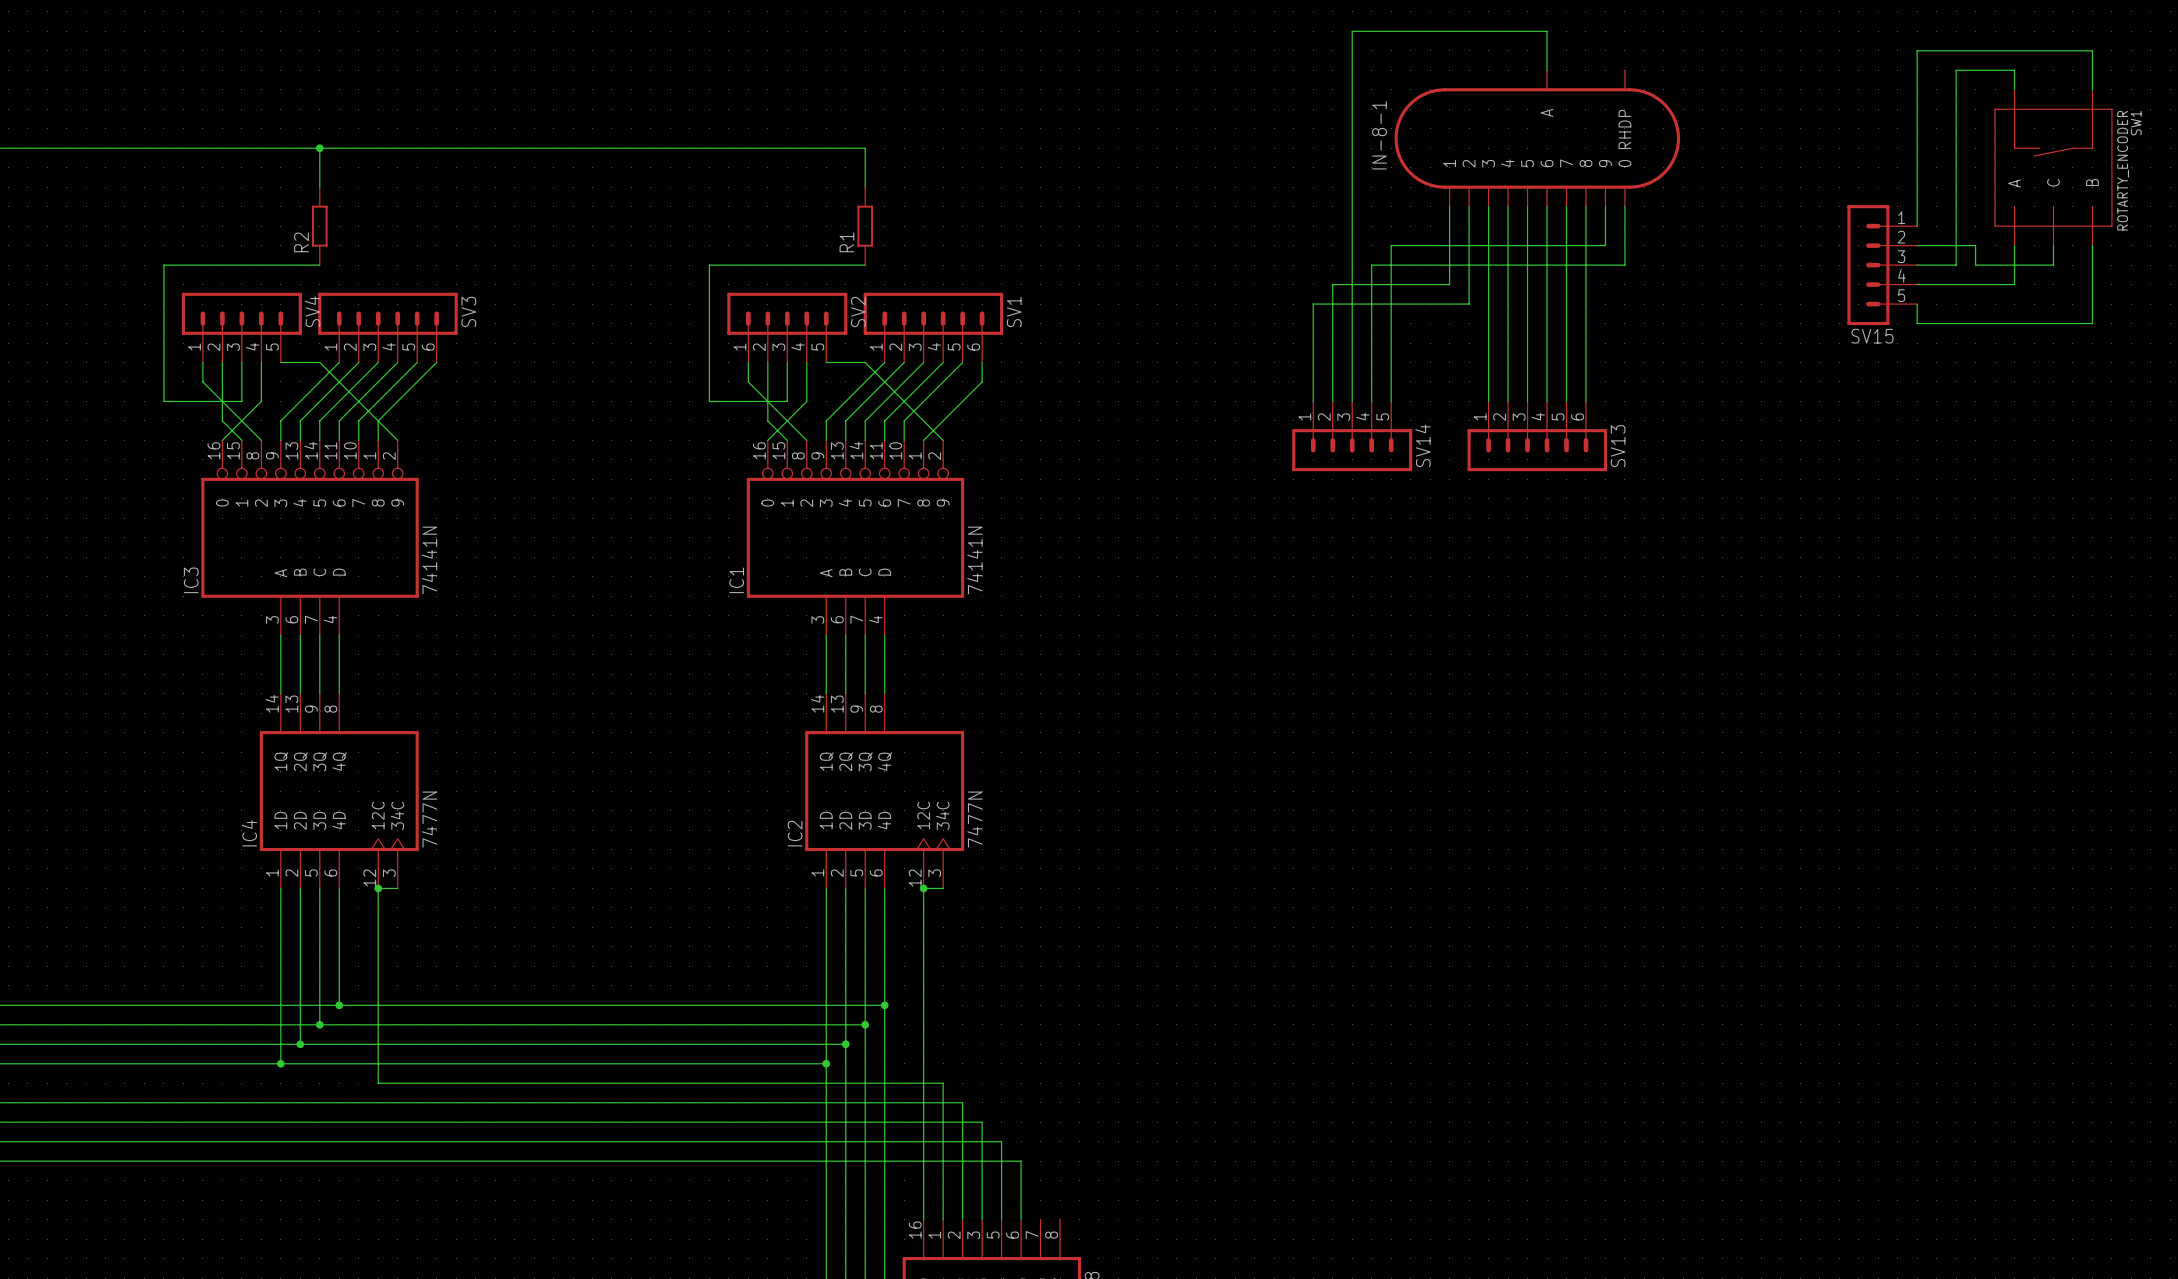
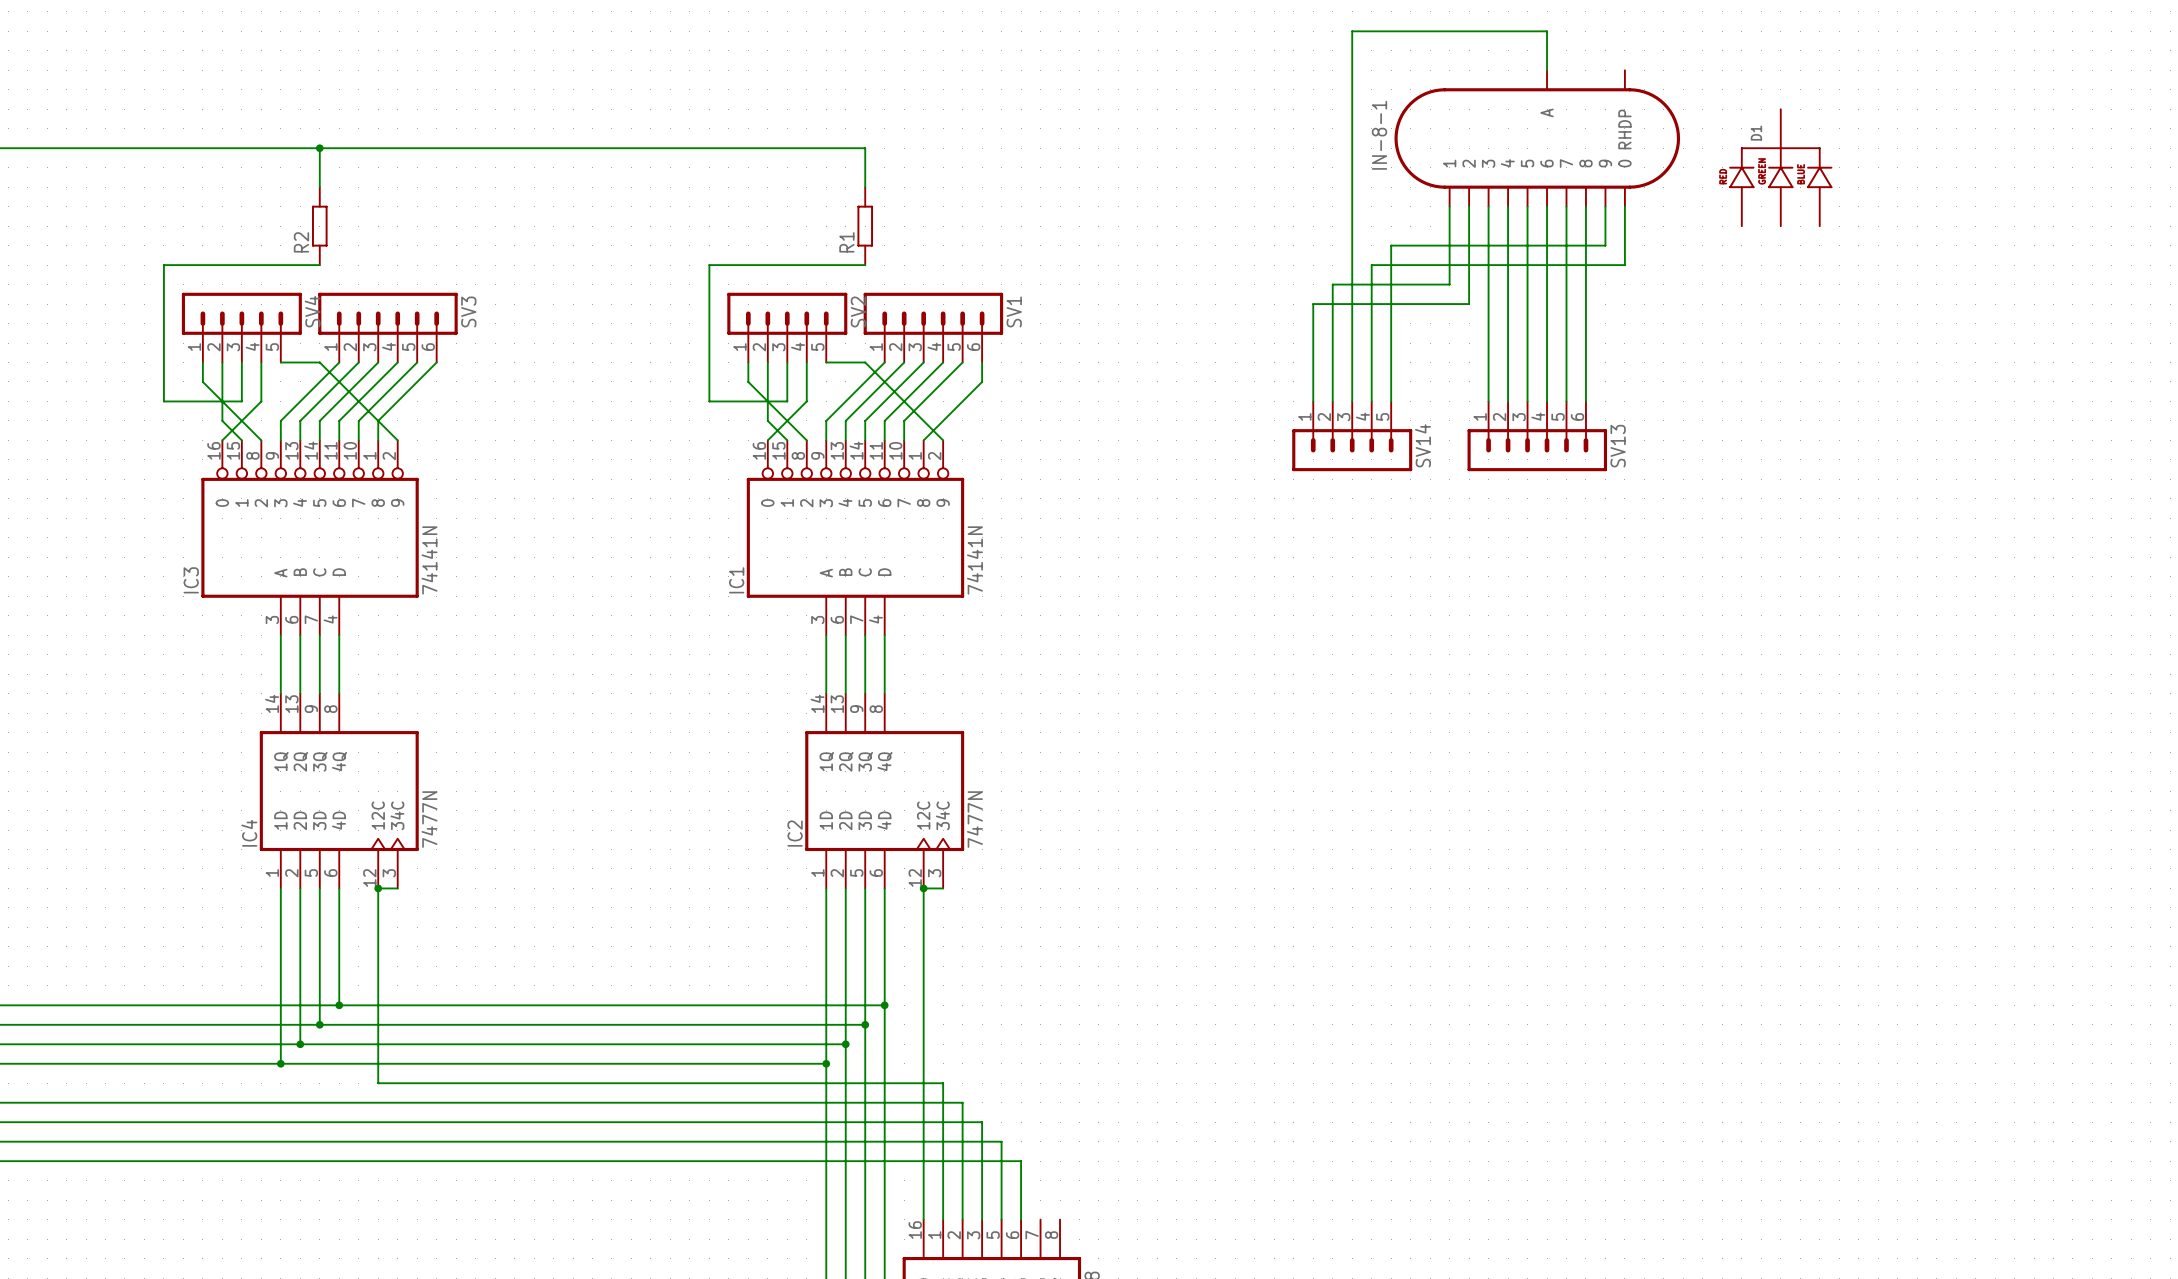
wire: (2014, 89) (2014, 70) (1956, 70) (1956, 265) (1917, 265) -> none
wire: (2092, 89) (2092, 50) (1917, 50) (1917, 226) -> none
D1: none -> (1780, 167)
SW1: ROTARTY_ENCODER (2053, 167) -> none
wire: (1917, 245) (1975, 245) (1975, 265) (2053, 265) (2053, 245) -> none
wire: (2014, 245) (2014, 284) (1917, 284) -> none
wire: (2092, 245) (2092, 323) (1917, 323) (1917, 304) -> none
SV15: (1882, 265) -> none

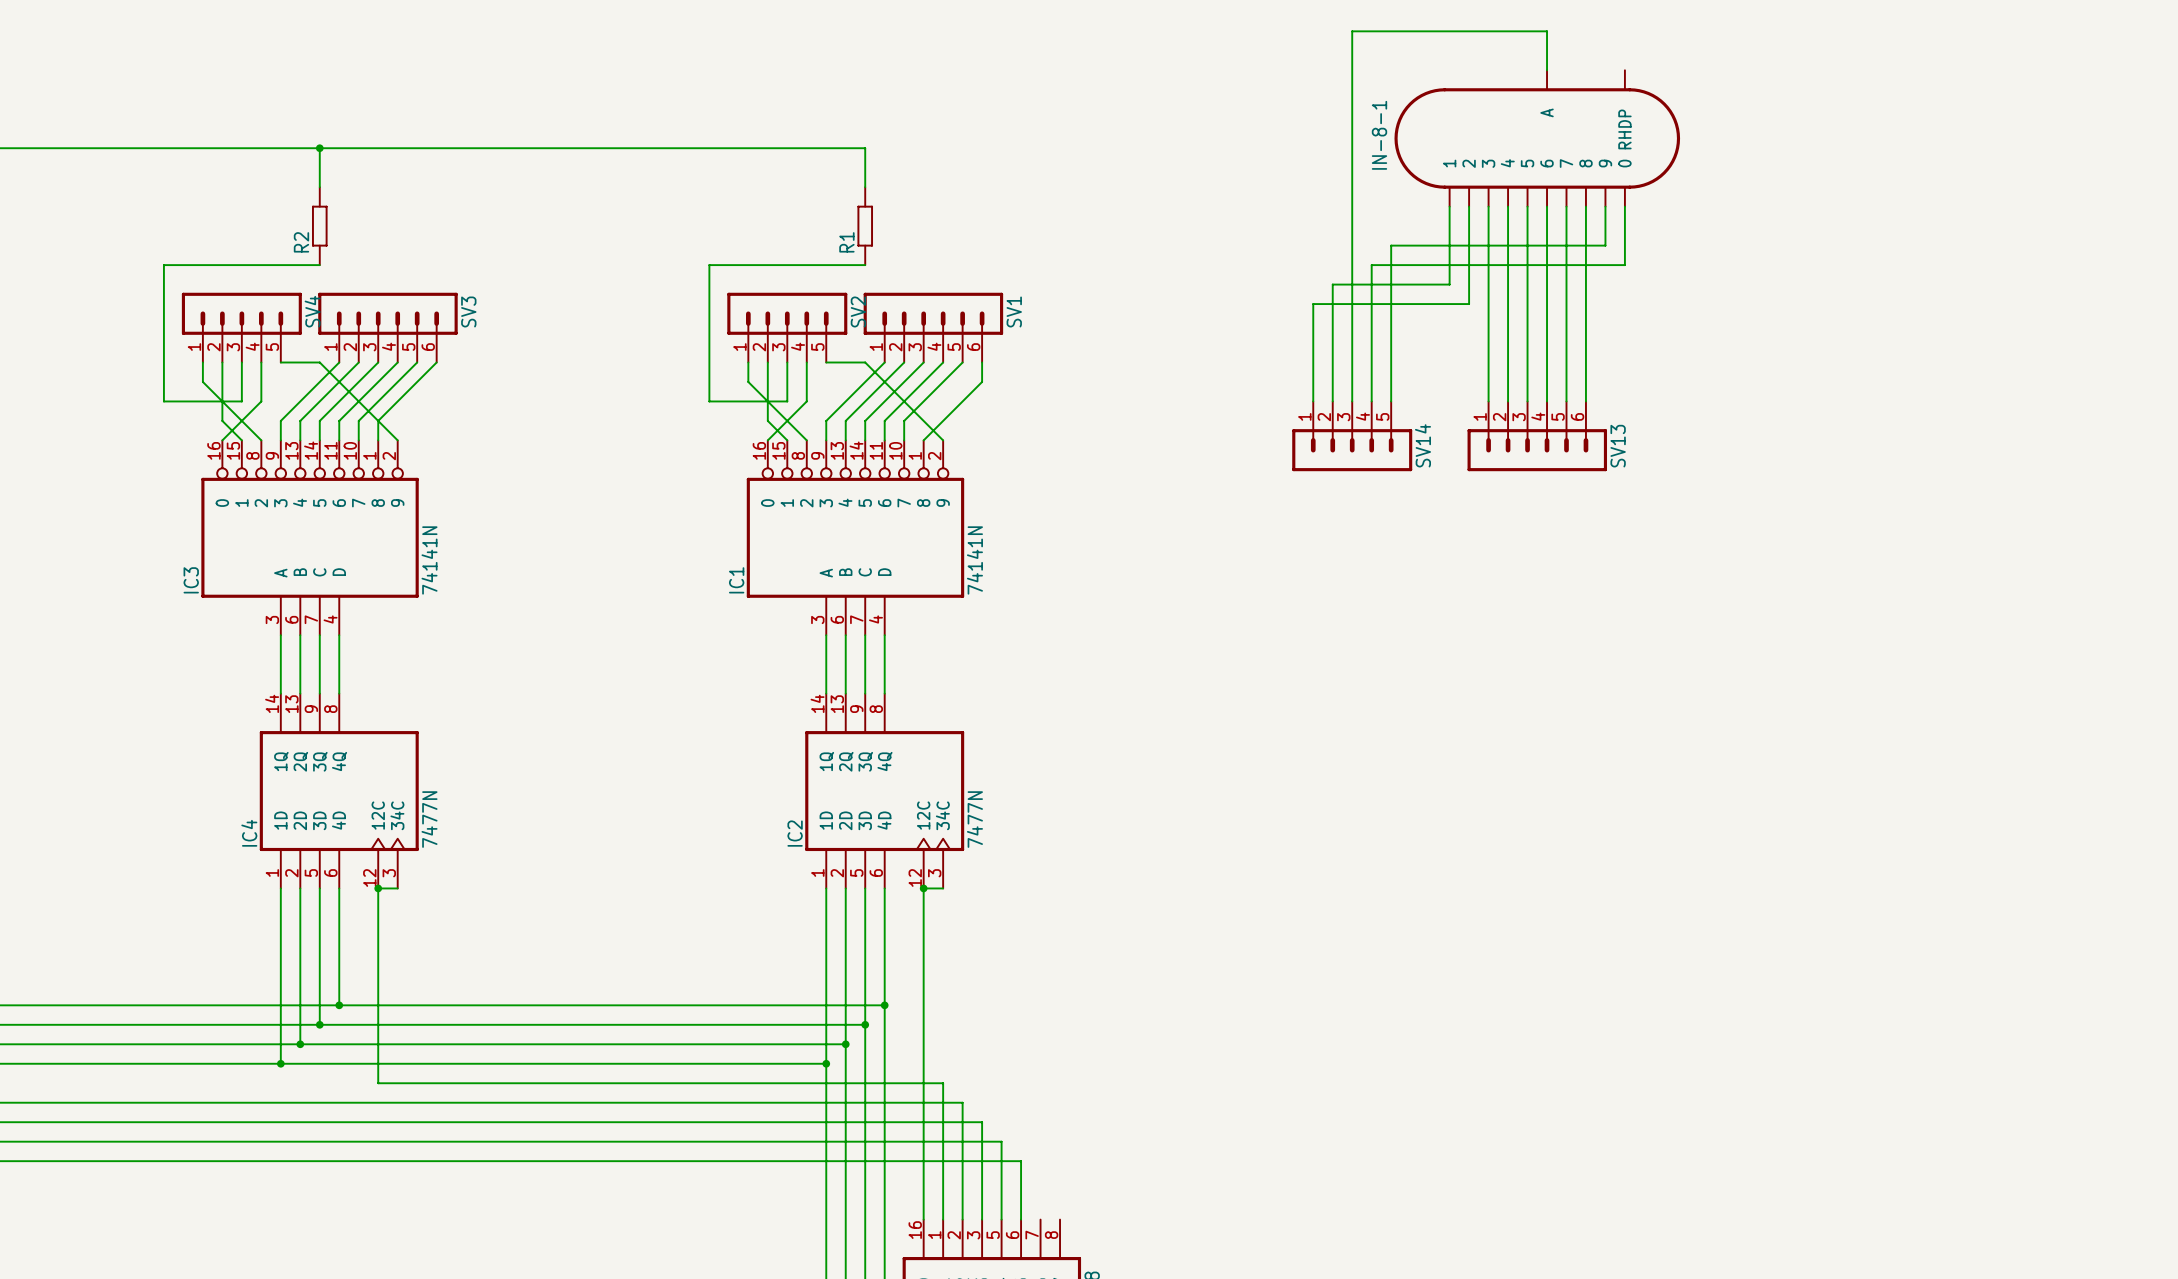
D1: (1780, 167) -> none

